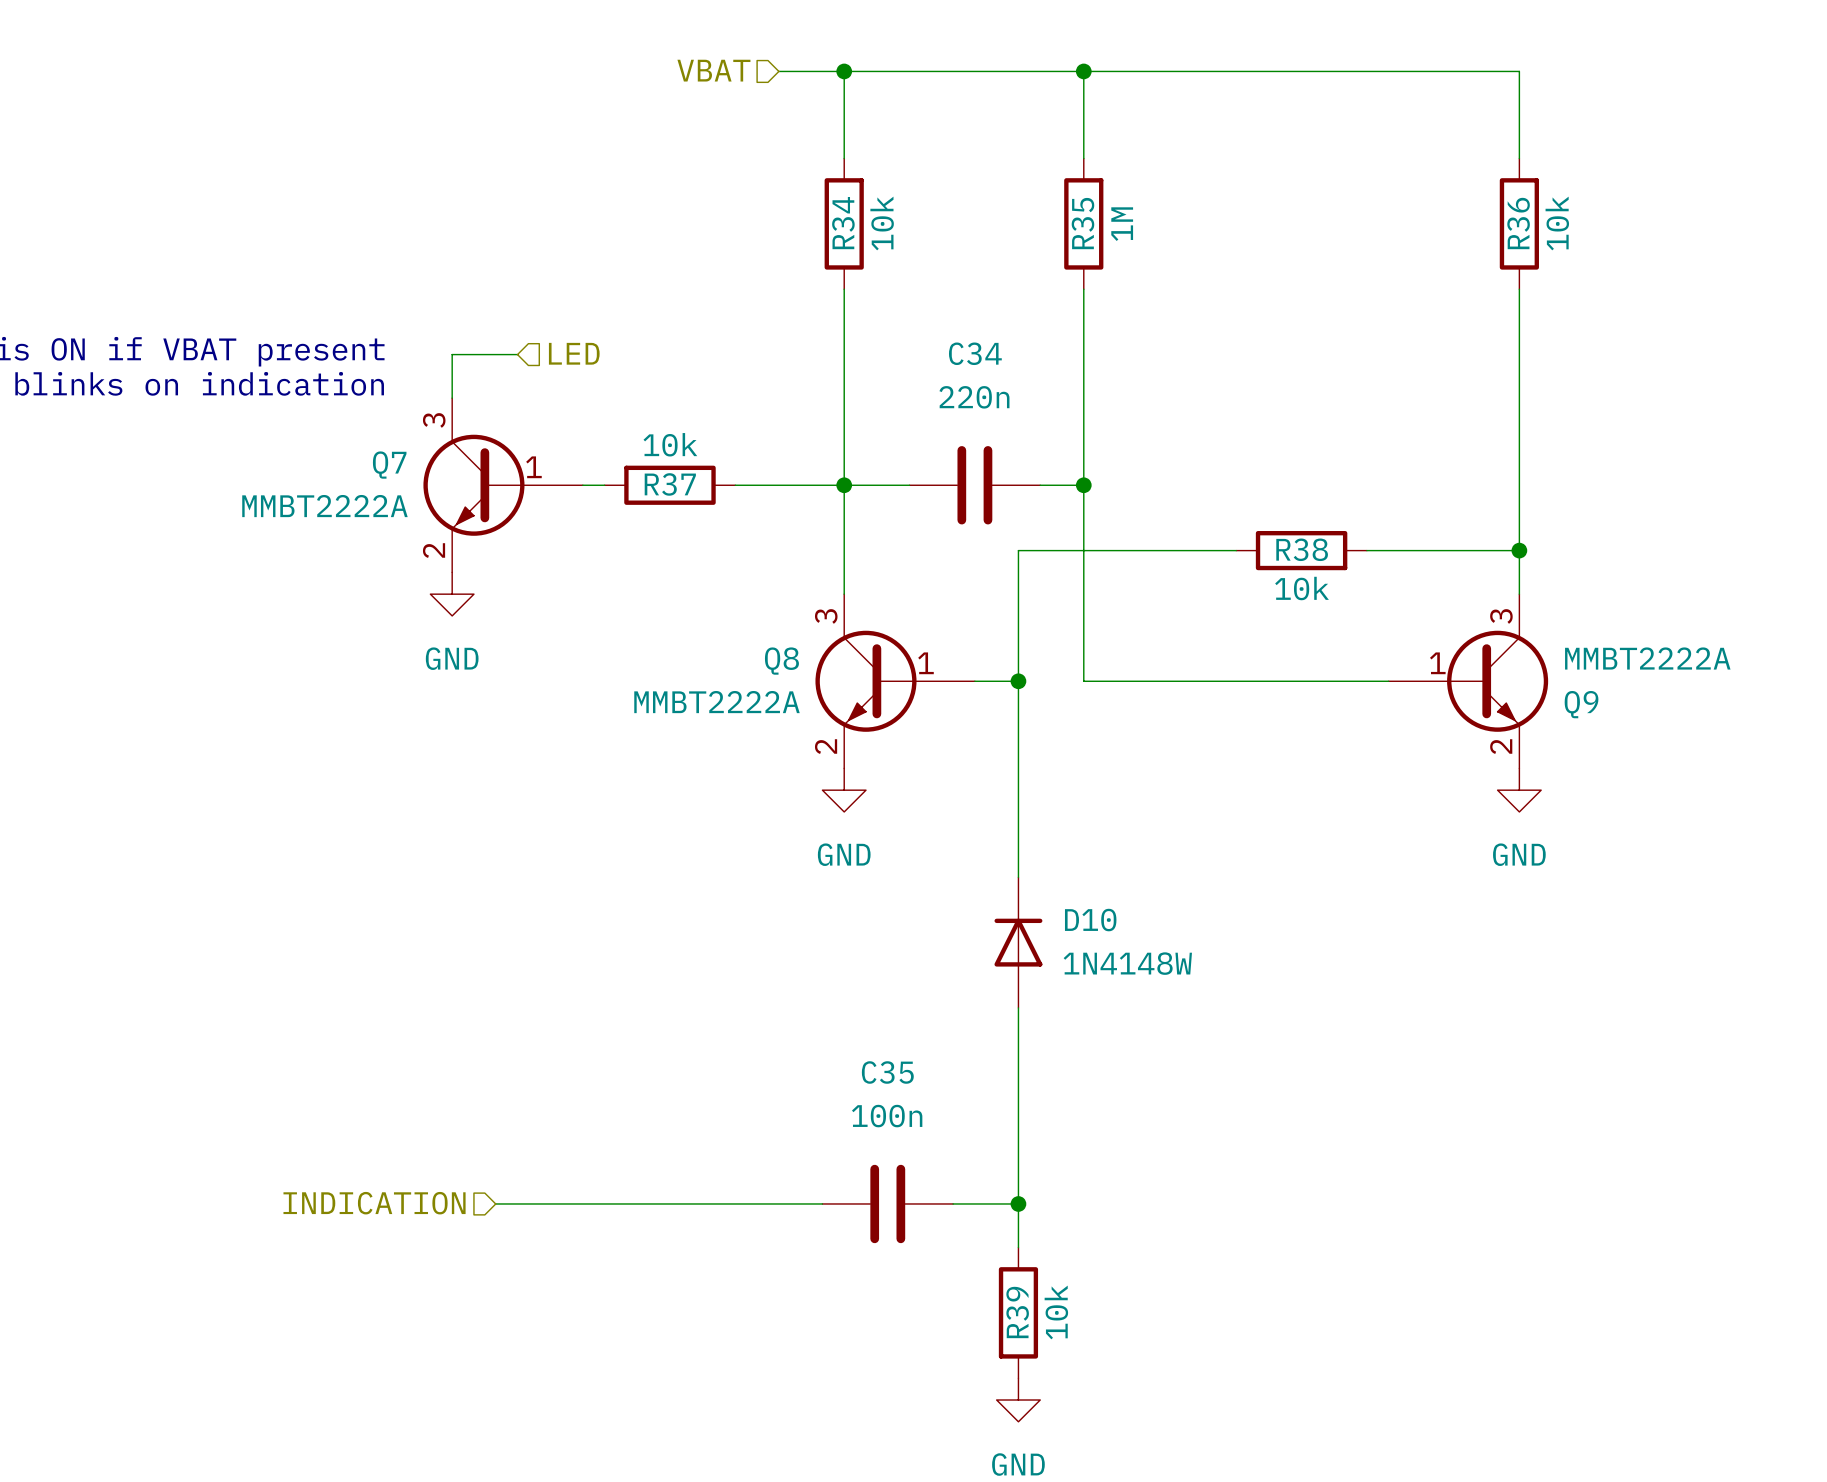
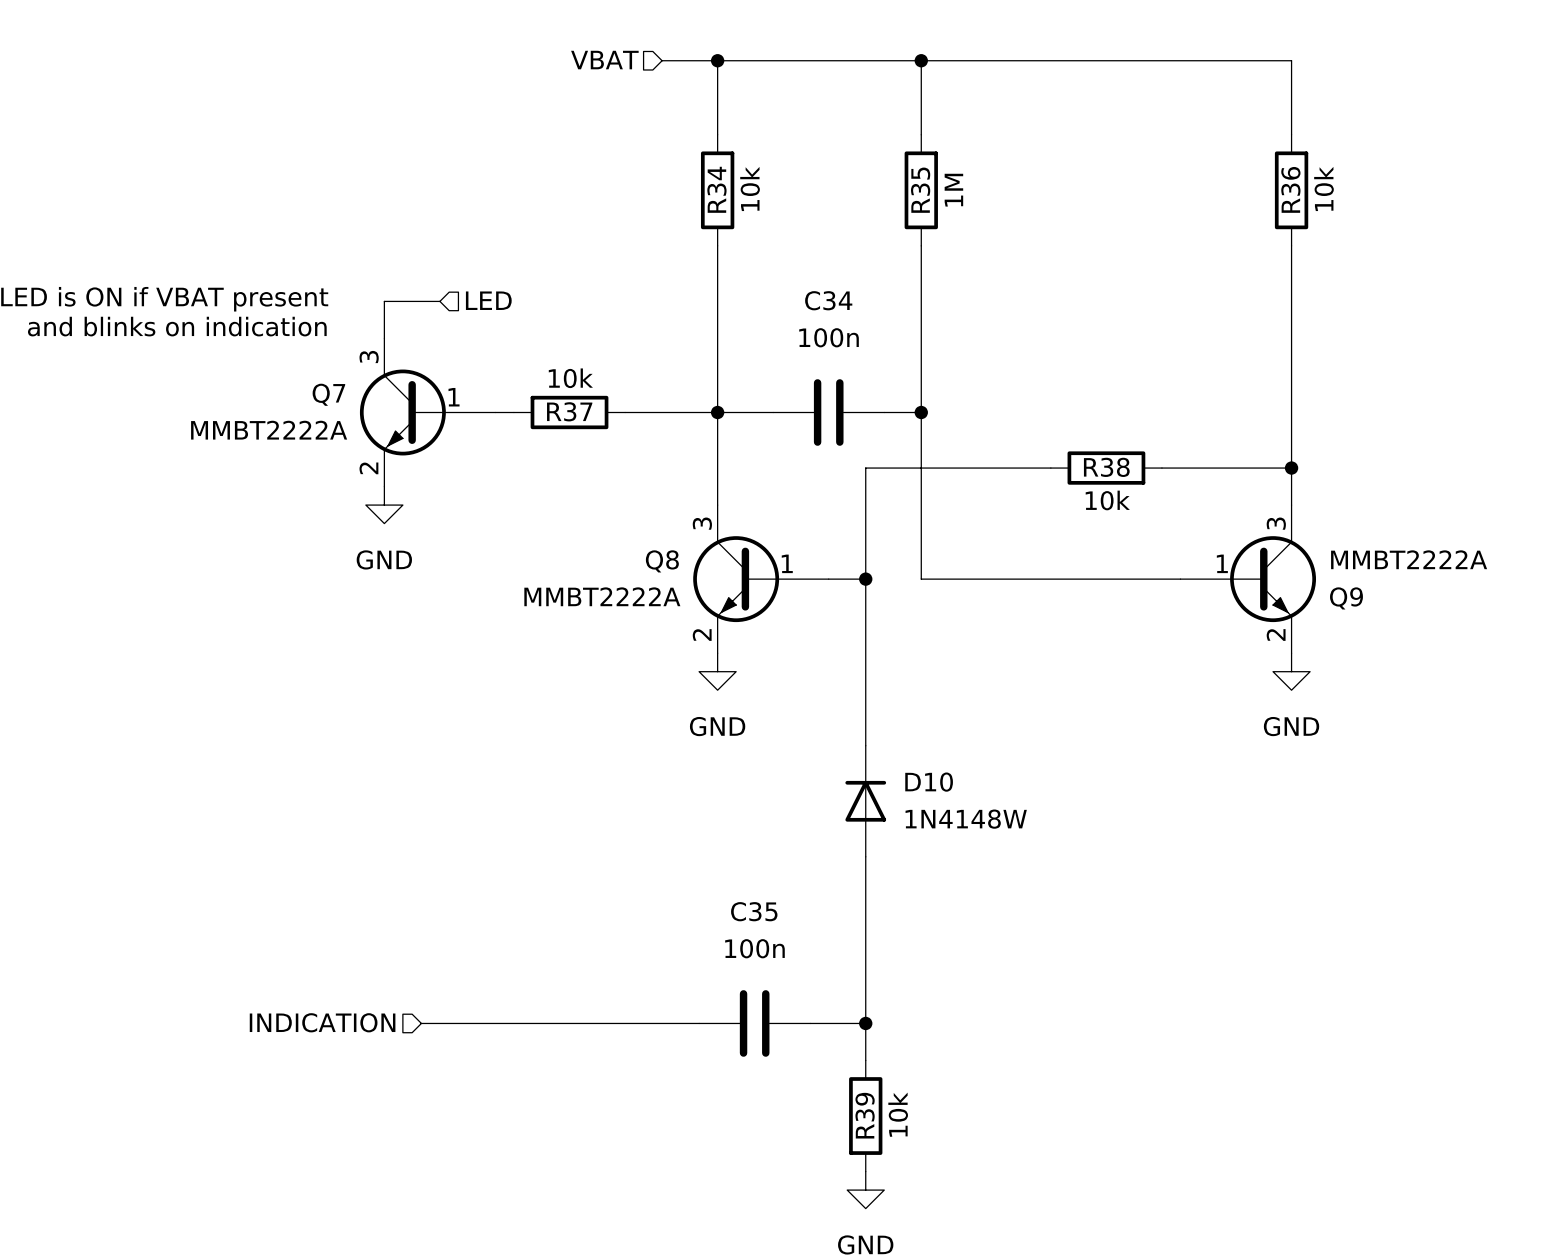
C34 value: 220n (974, 397) -> 100n (829, 337)

